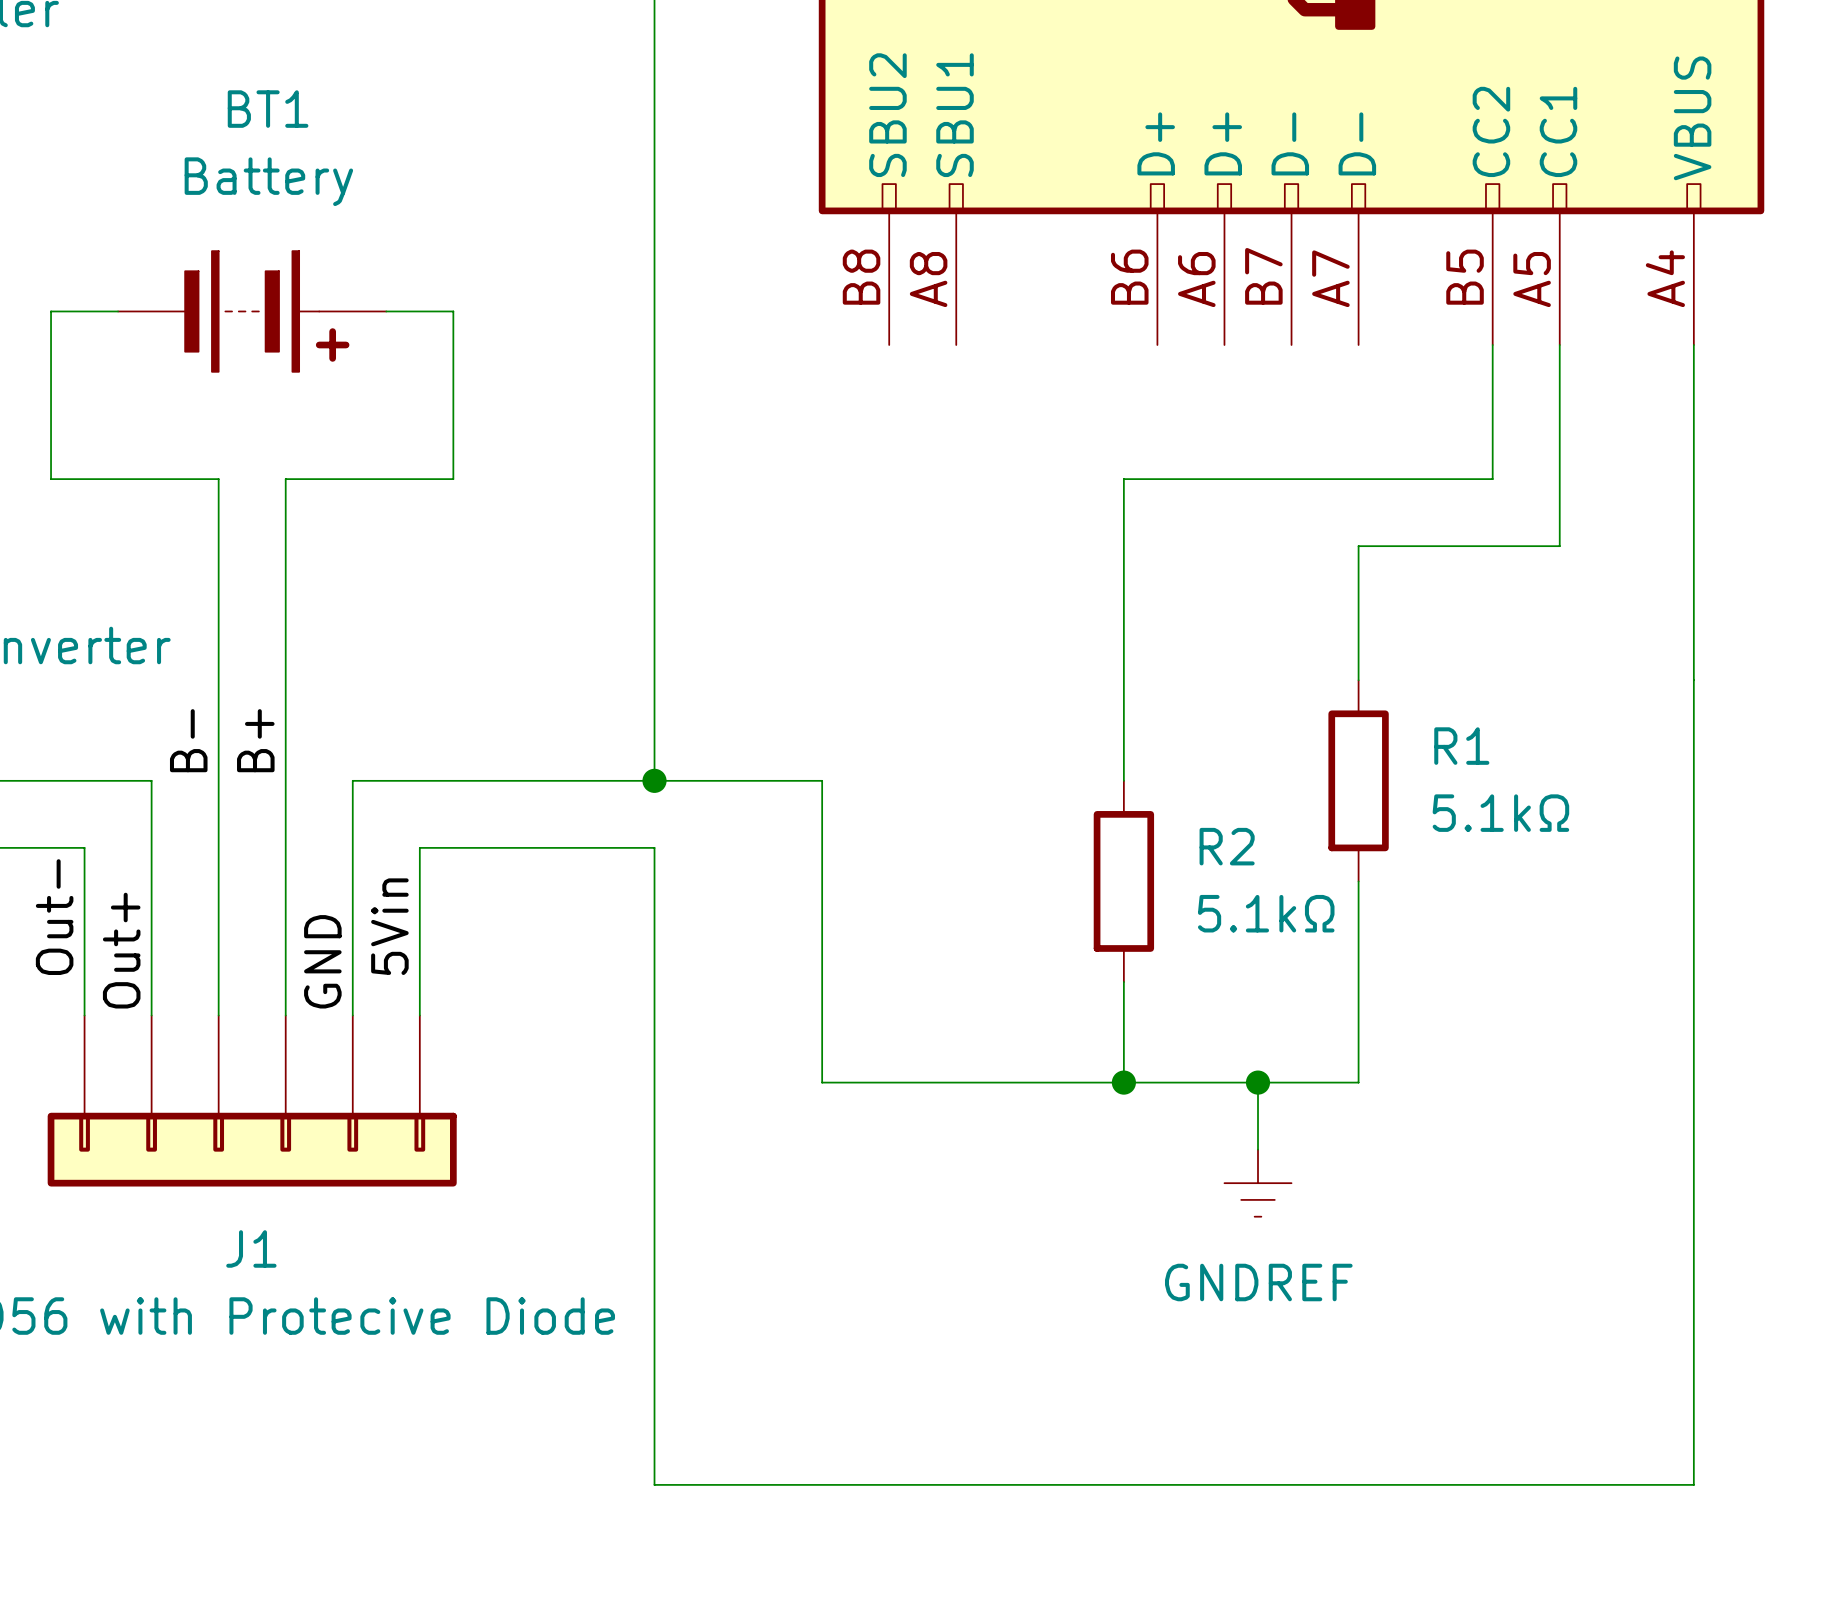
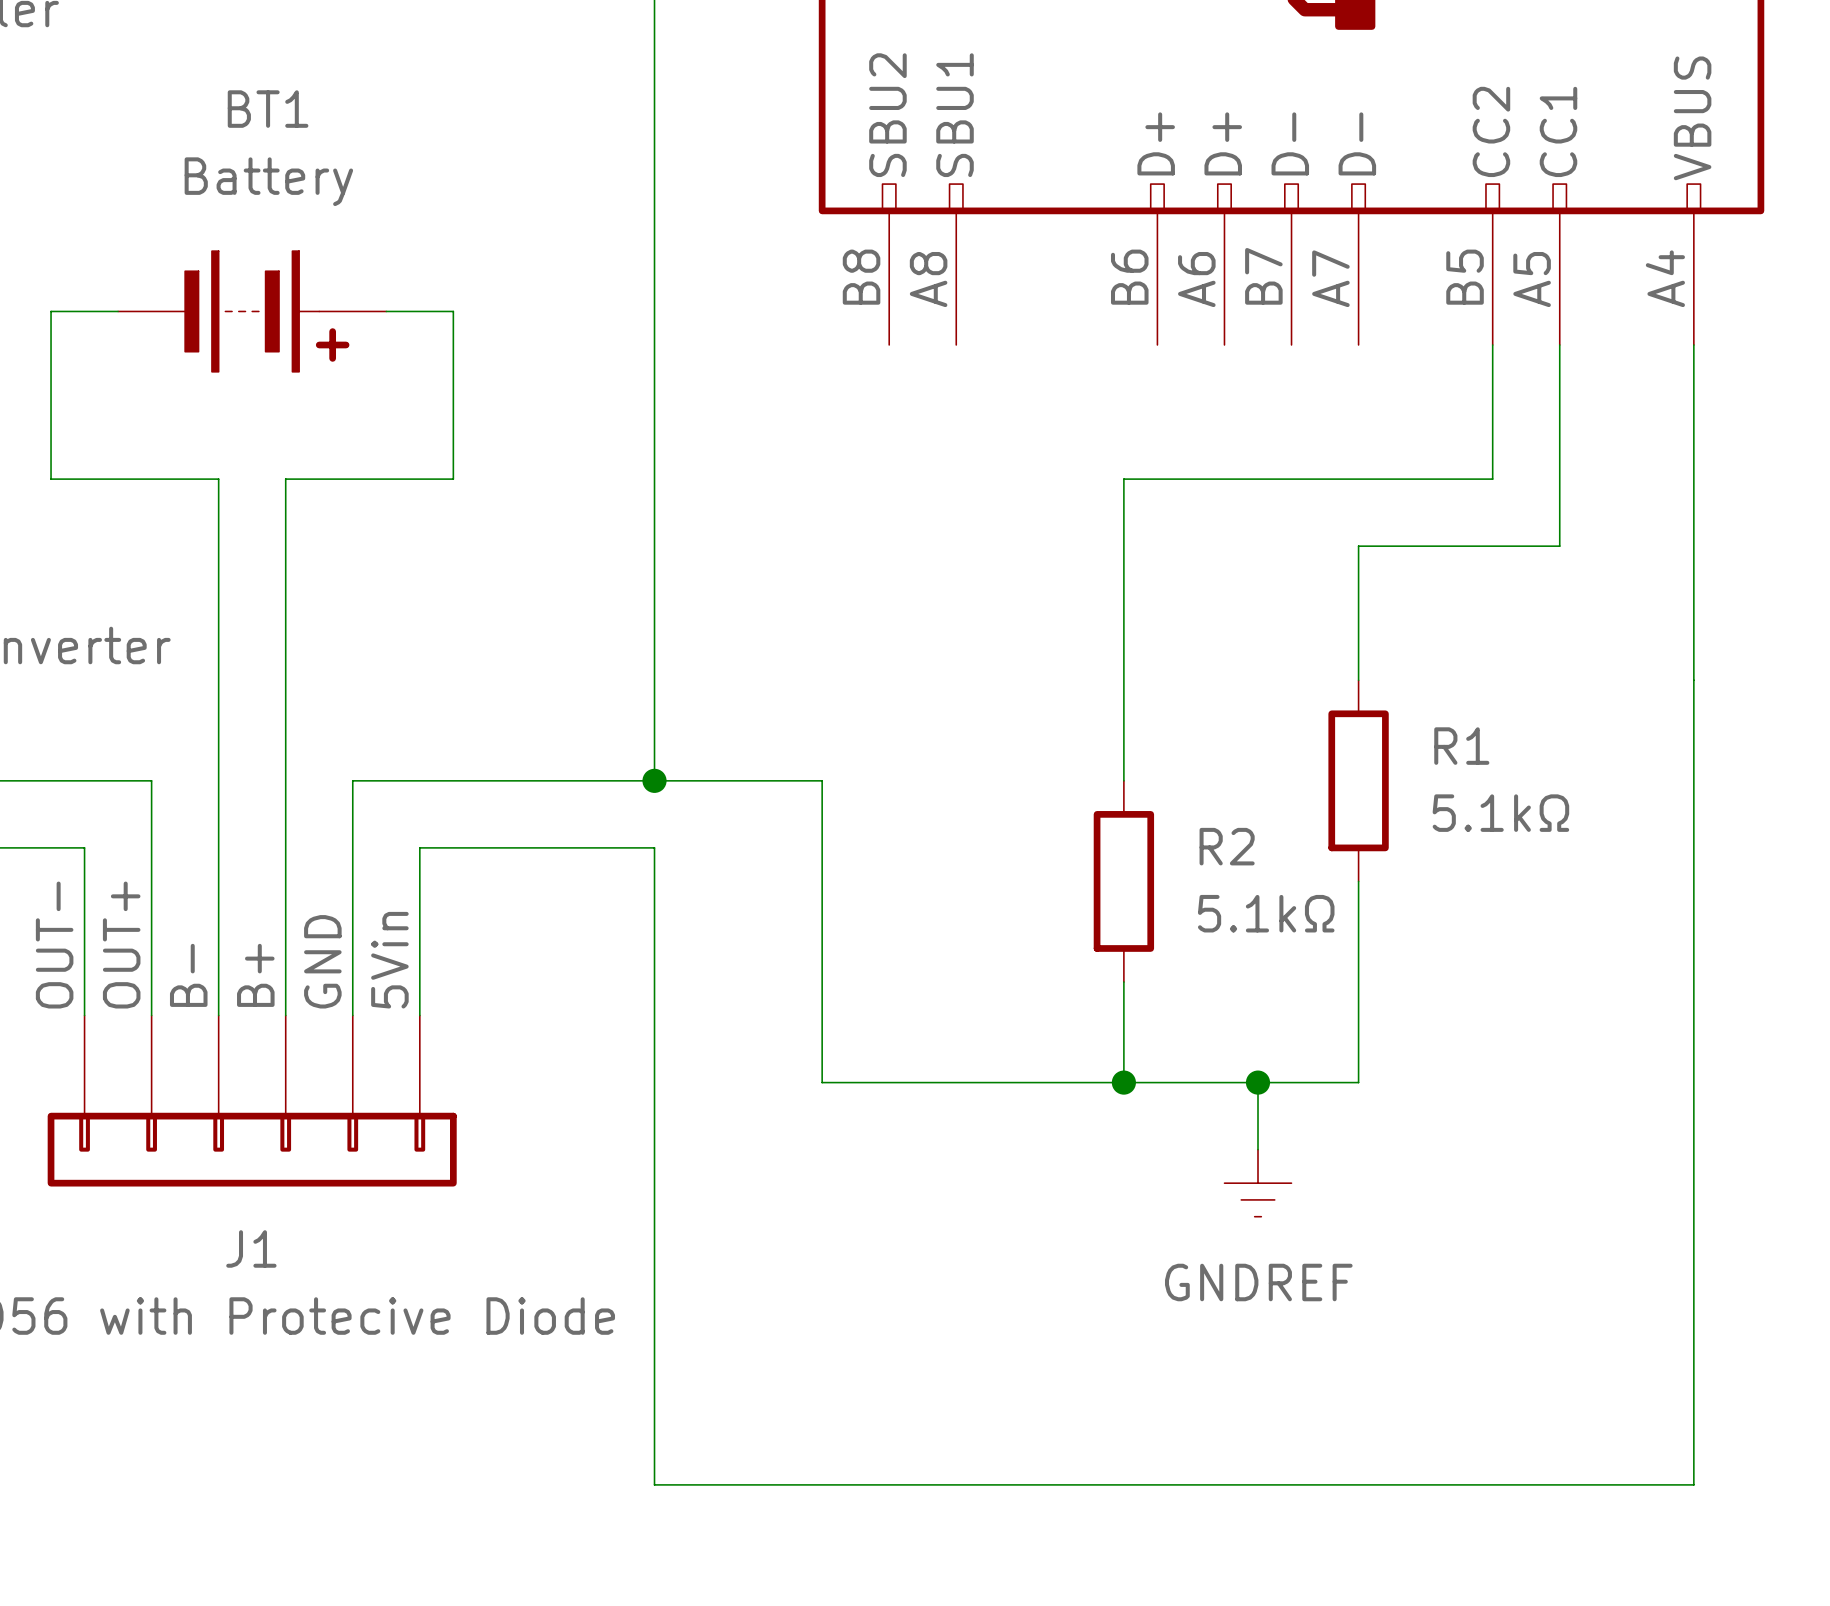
label position: B- (188, 740) -> B- (188, 975)
label position: B+ (255, 740) -> B+ (255, 975)
label: Out- (54, 917) -> none
label position: 5Vin (389, 926) -> 5Vin (389, 960)
label: none -> OUT- (54, 945)
label: Out+ (121, 950) -> OUT+ (121, 945)

